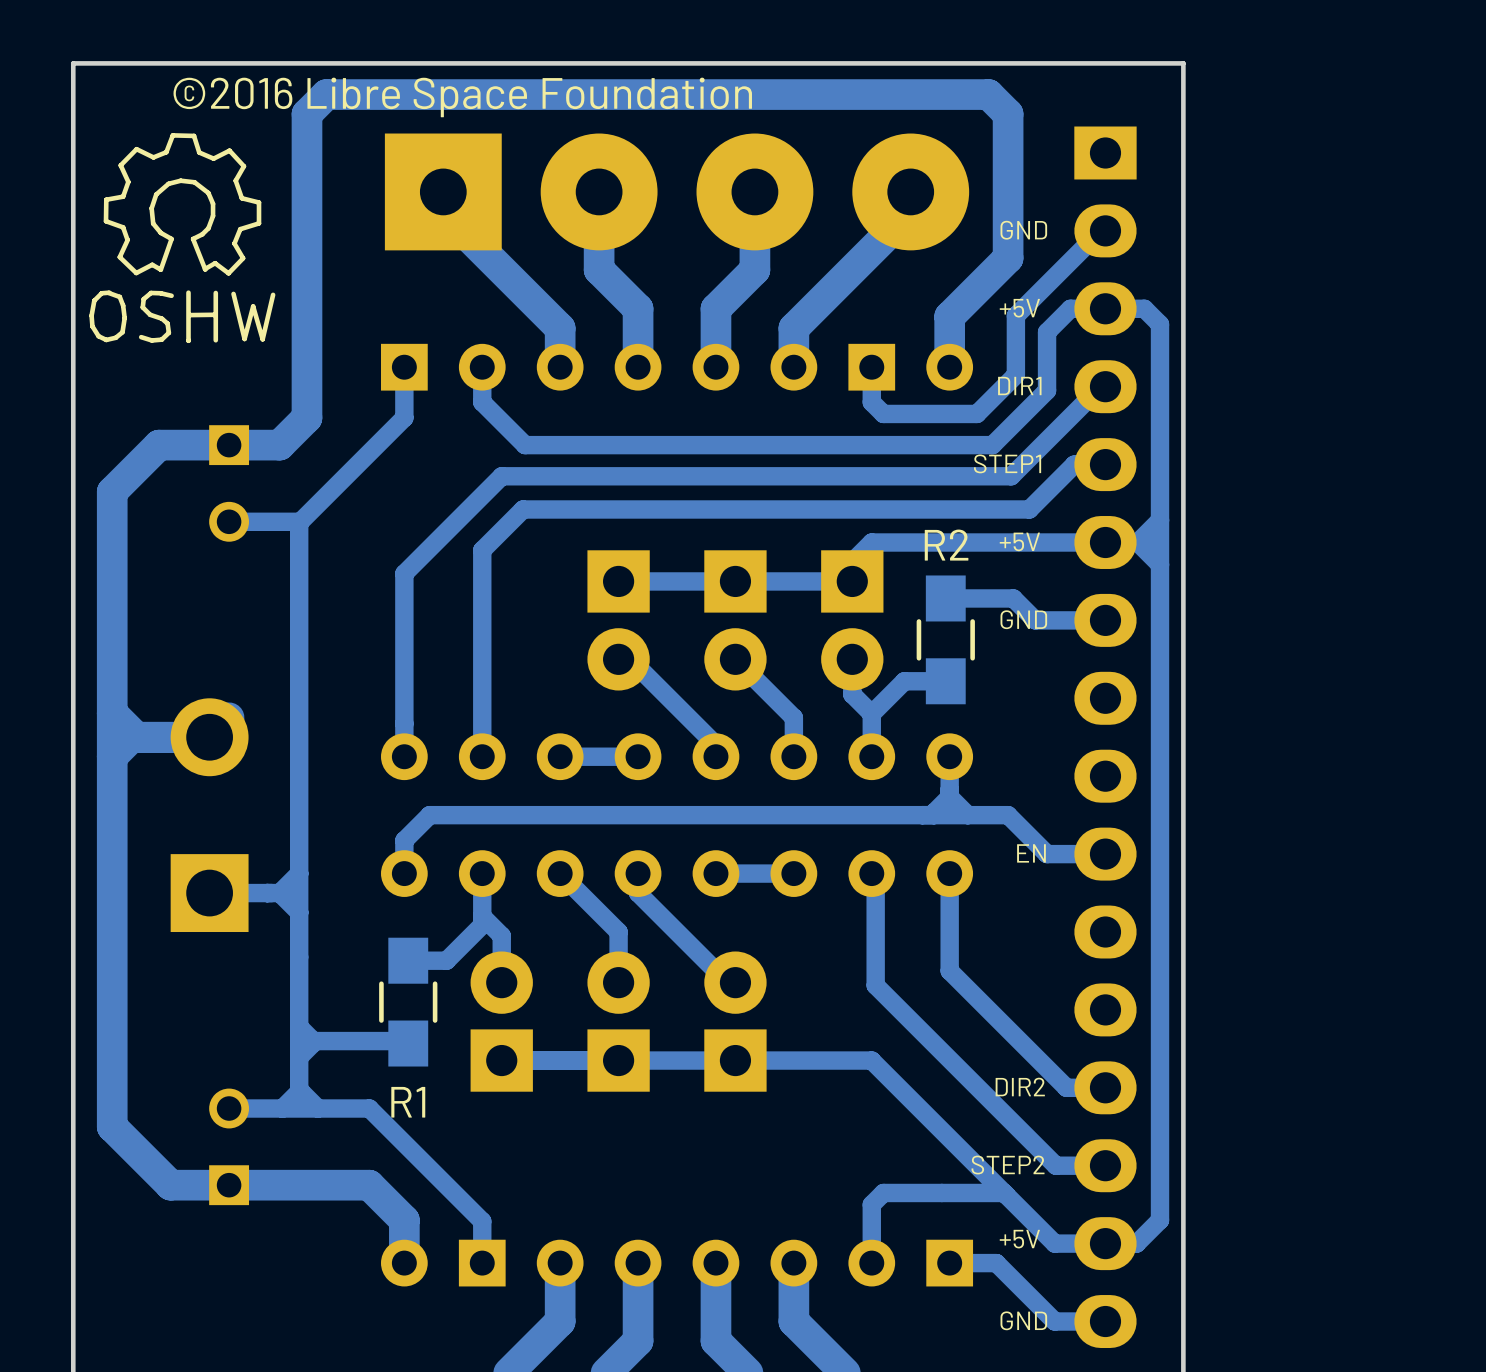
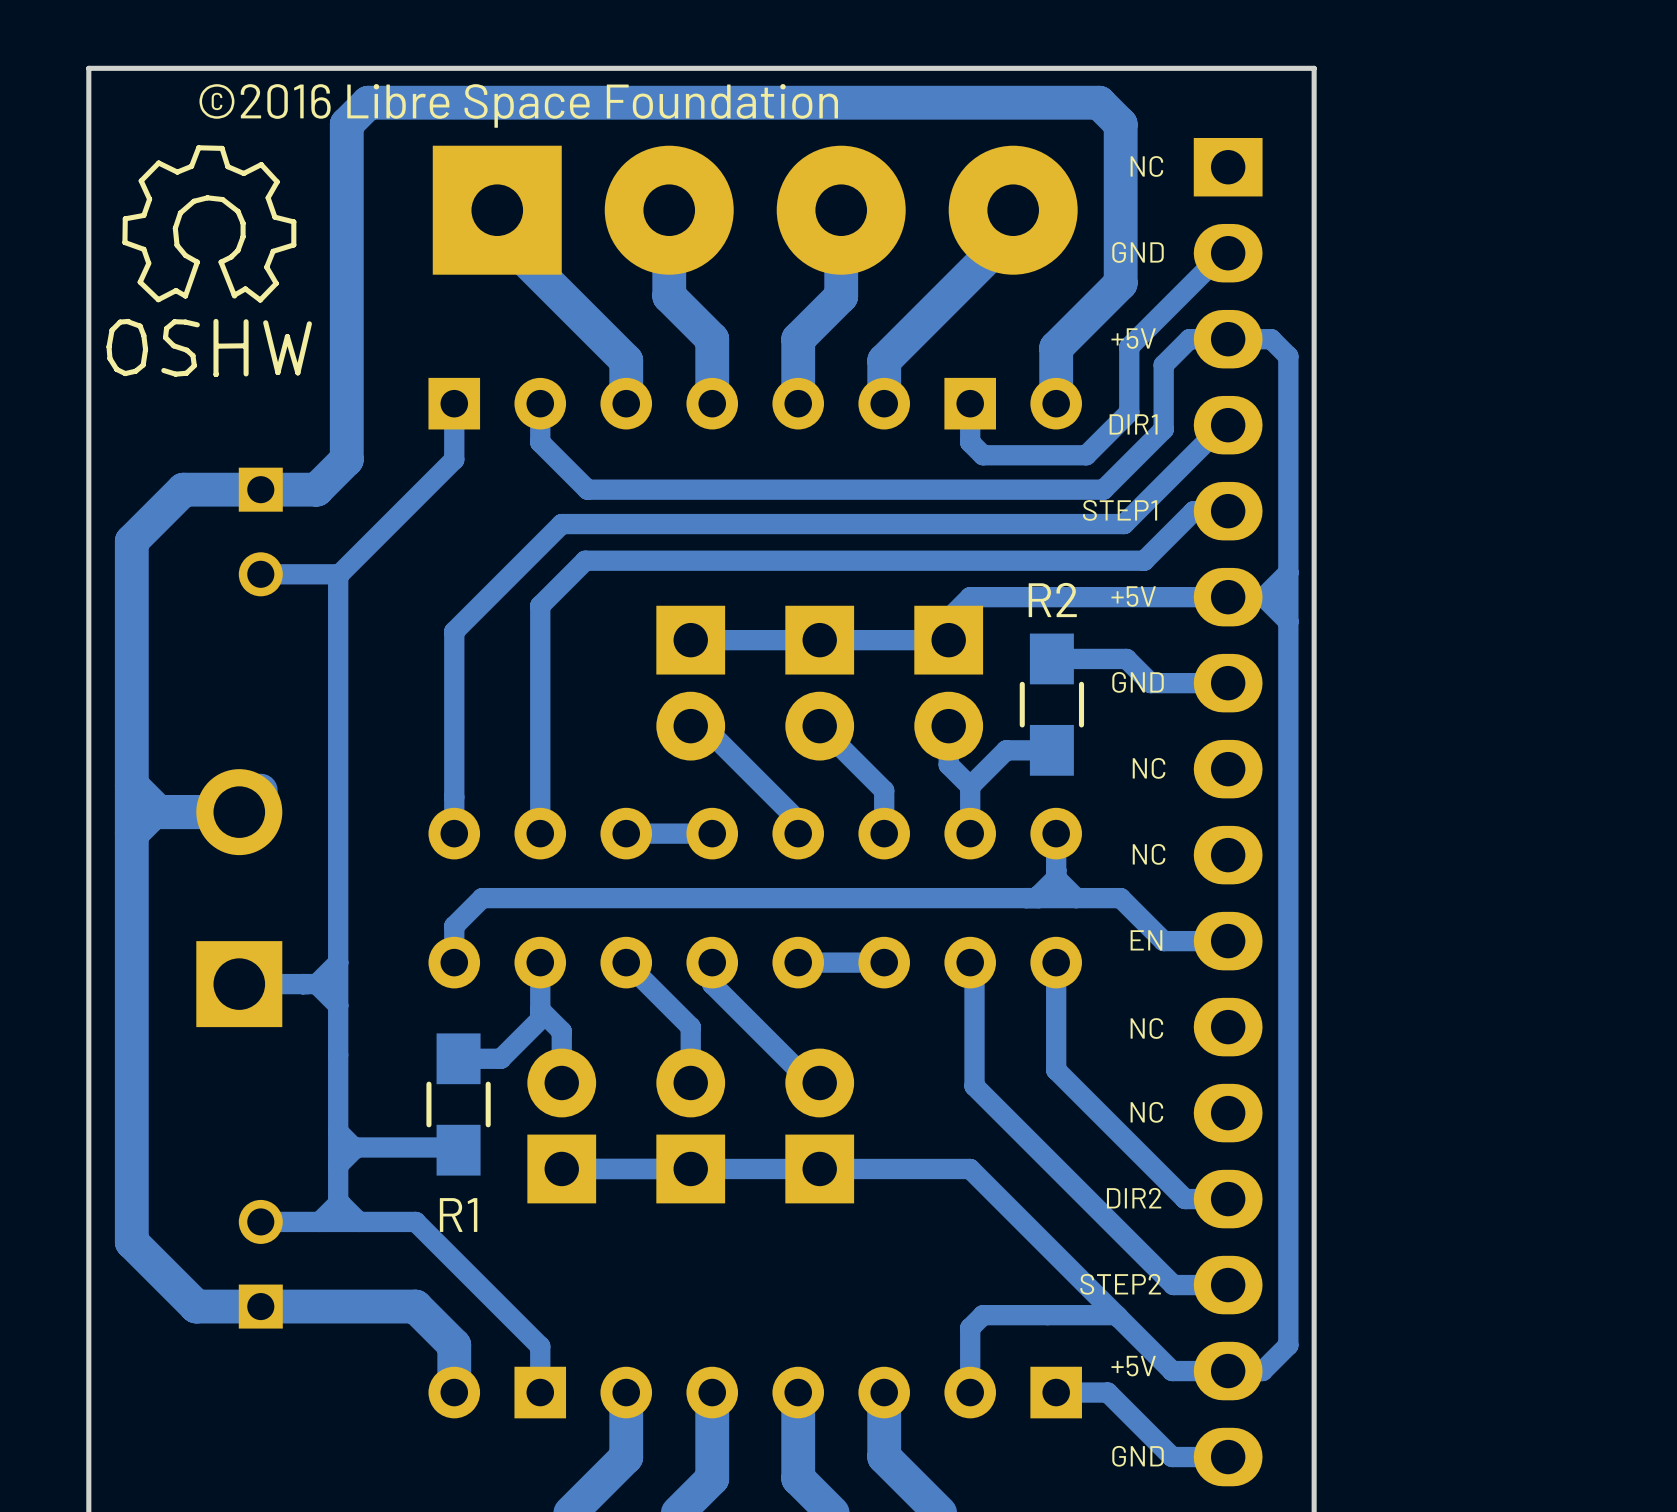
text: none -> NC (1146, 166)
text: none -> NC (1149, 768)
text: none -> NC (1149, 854)
text: none -> NC (1146, 1028)
text: none -> NC (1146, 1112)

